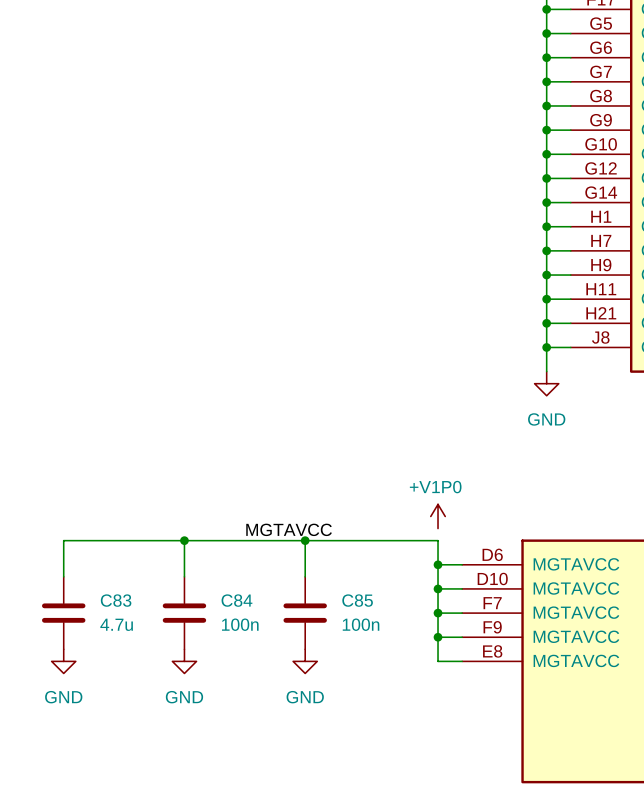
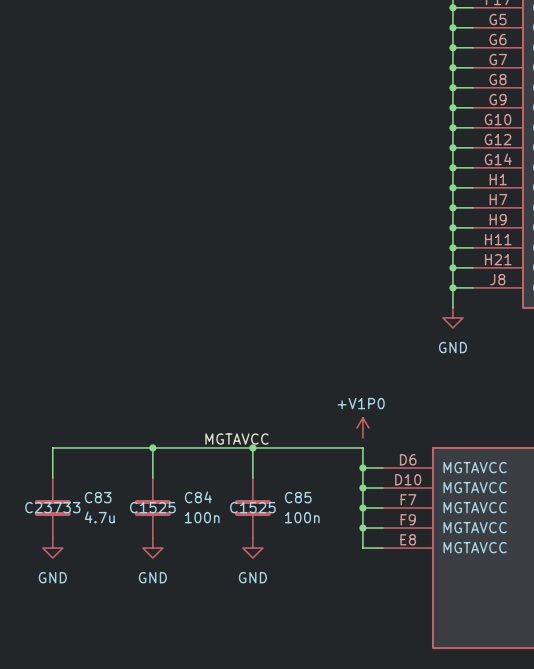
C83 text: none -> C23733 (52, 507)
C84 text: none -> C1525 (152, 507)
C85 text: none -> C1525 (252, 507)

